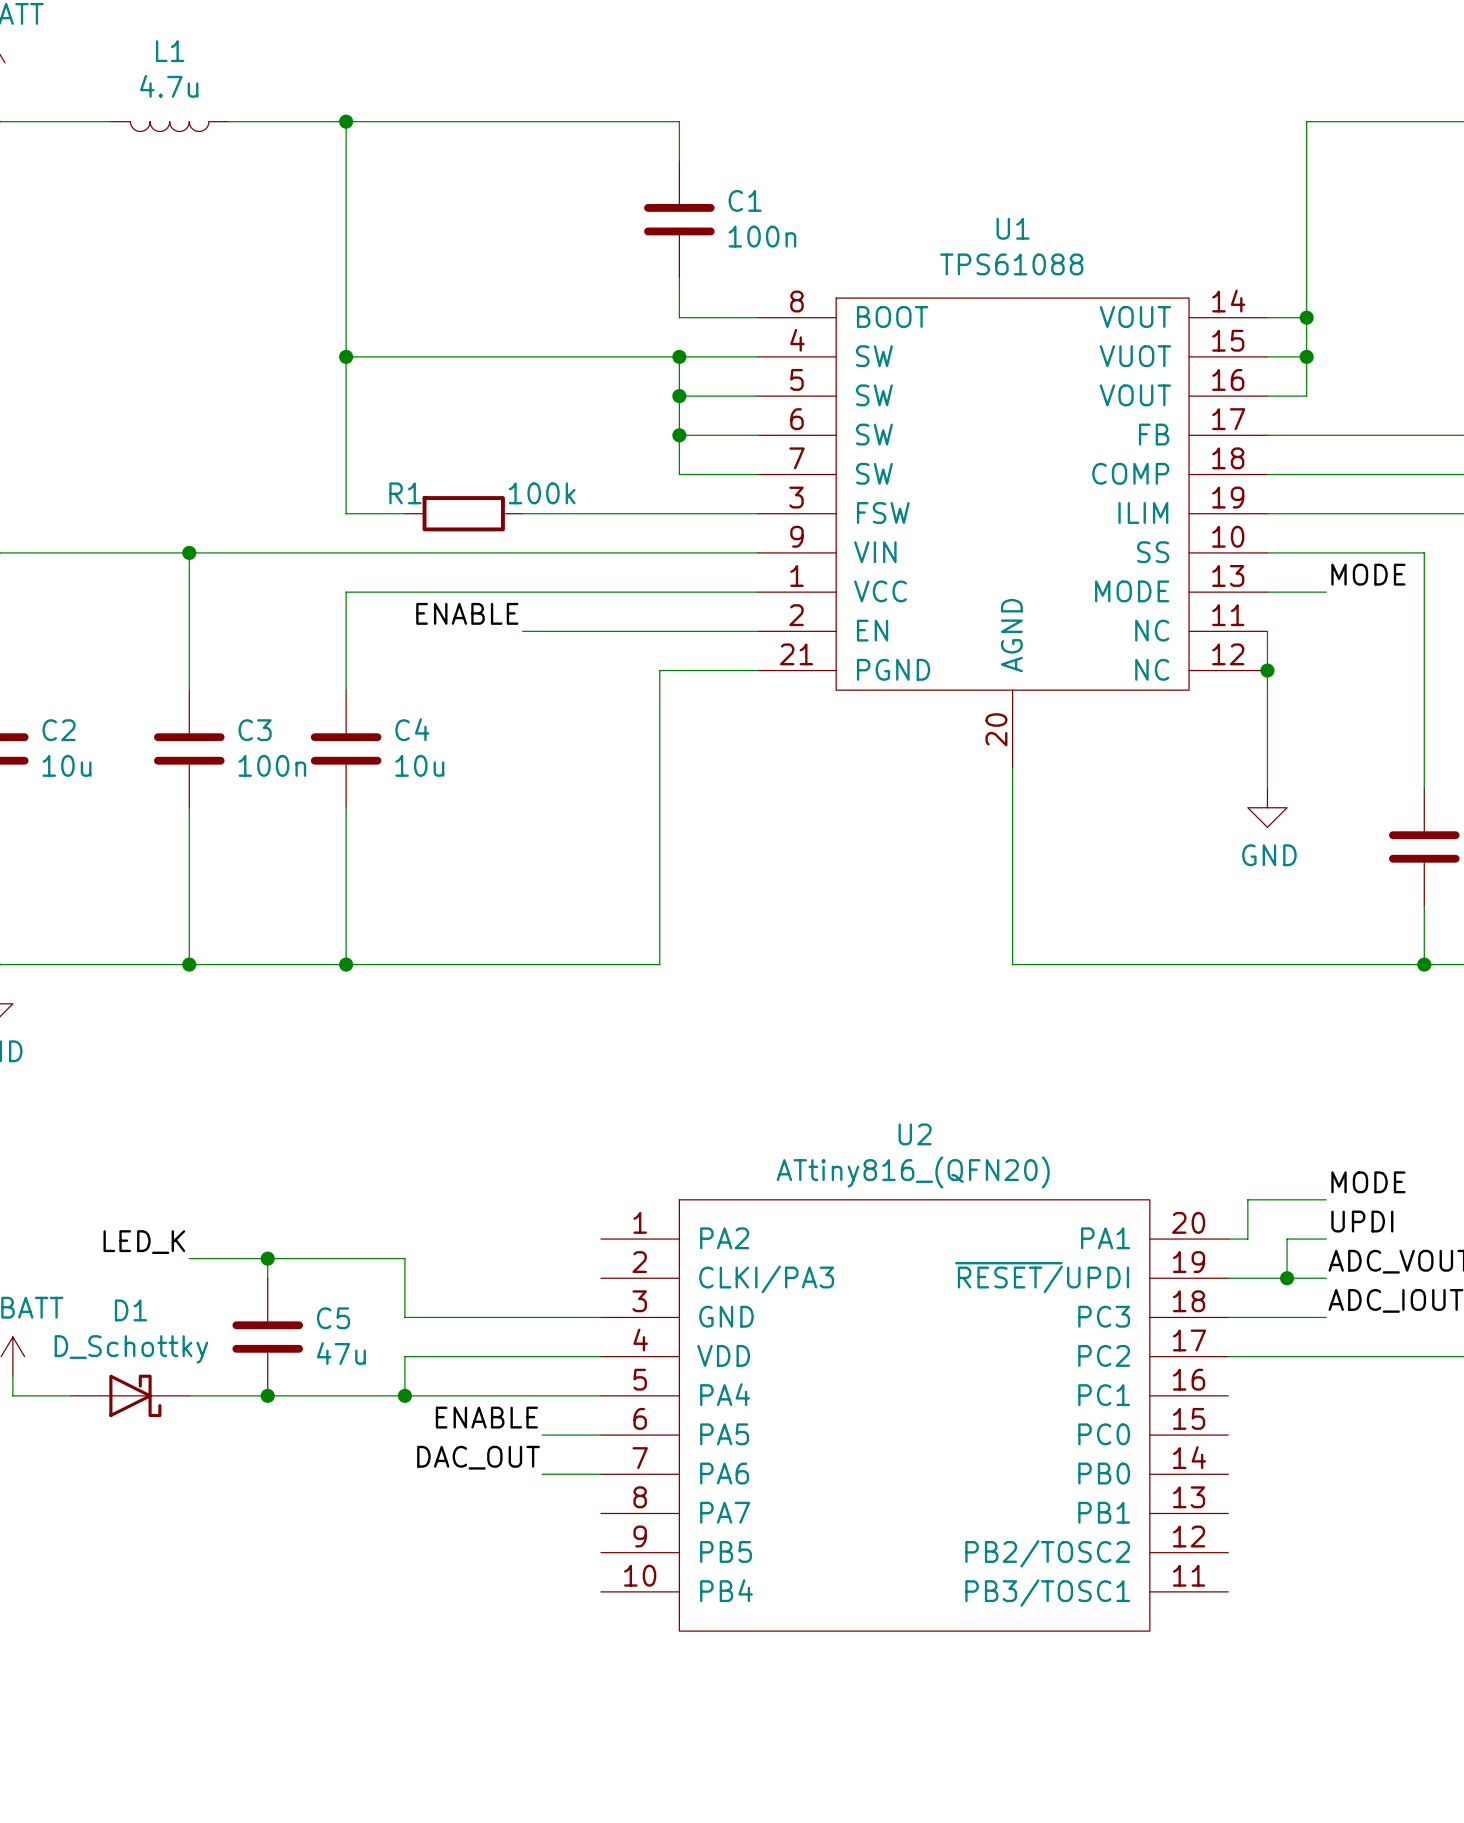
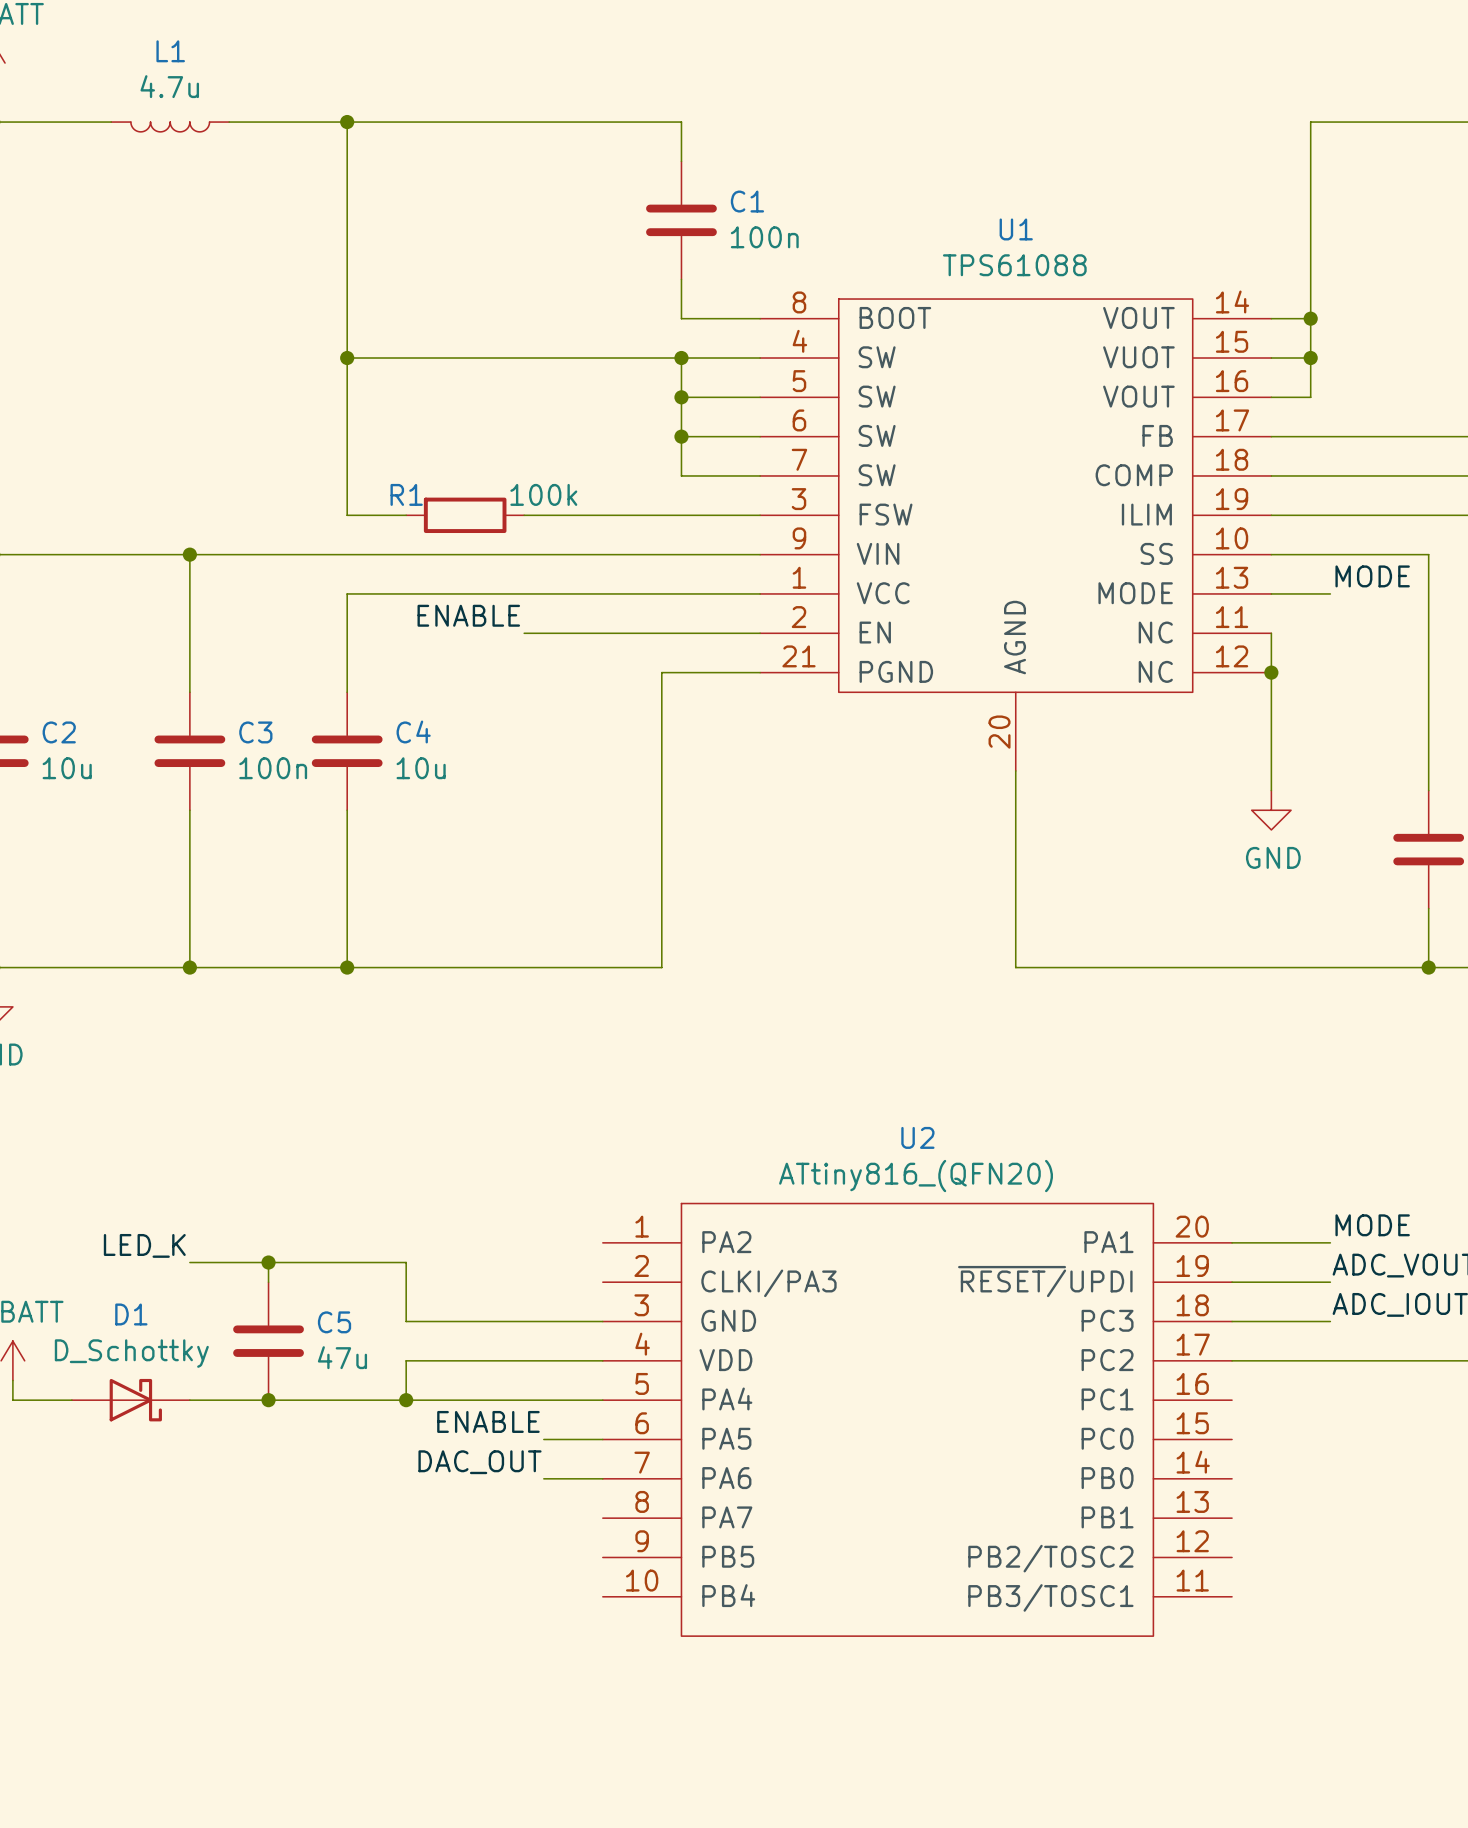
label: MODE (1368, 1182) -> none
wire: (1326, 1199) (1247, 1199) (1247, 1239) -> none
label: UPDI (1362, 1221) -> MODE (1372, 1225)
wire: (1287, 1239) (1287, 1278) -> (1291, 1242) (1251, 1242)
junction: (1287, 1278) -> none

